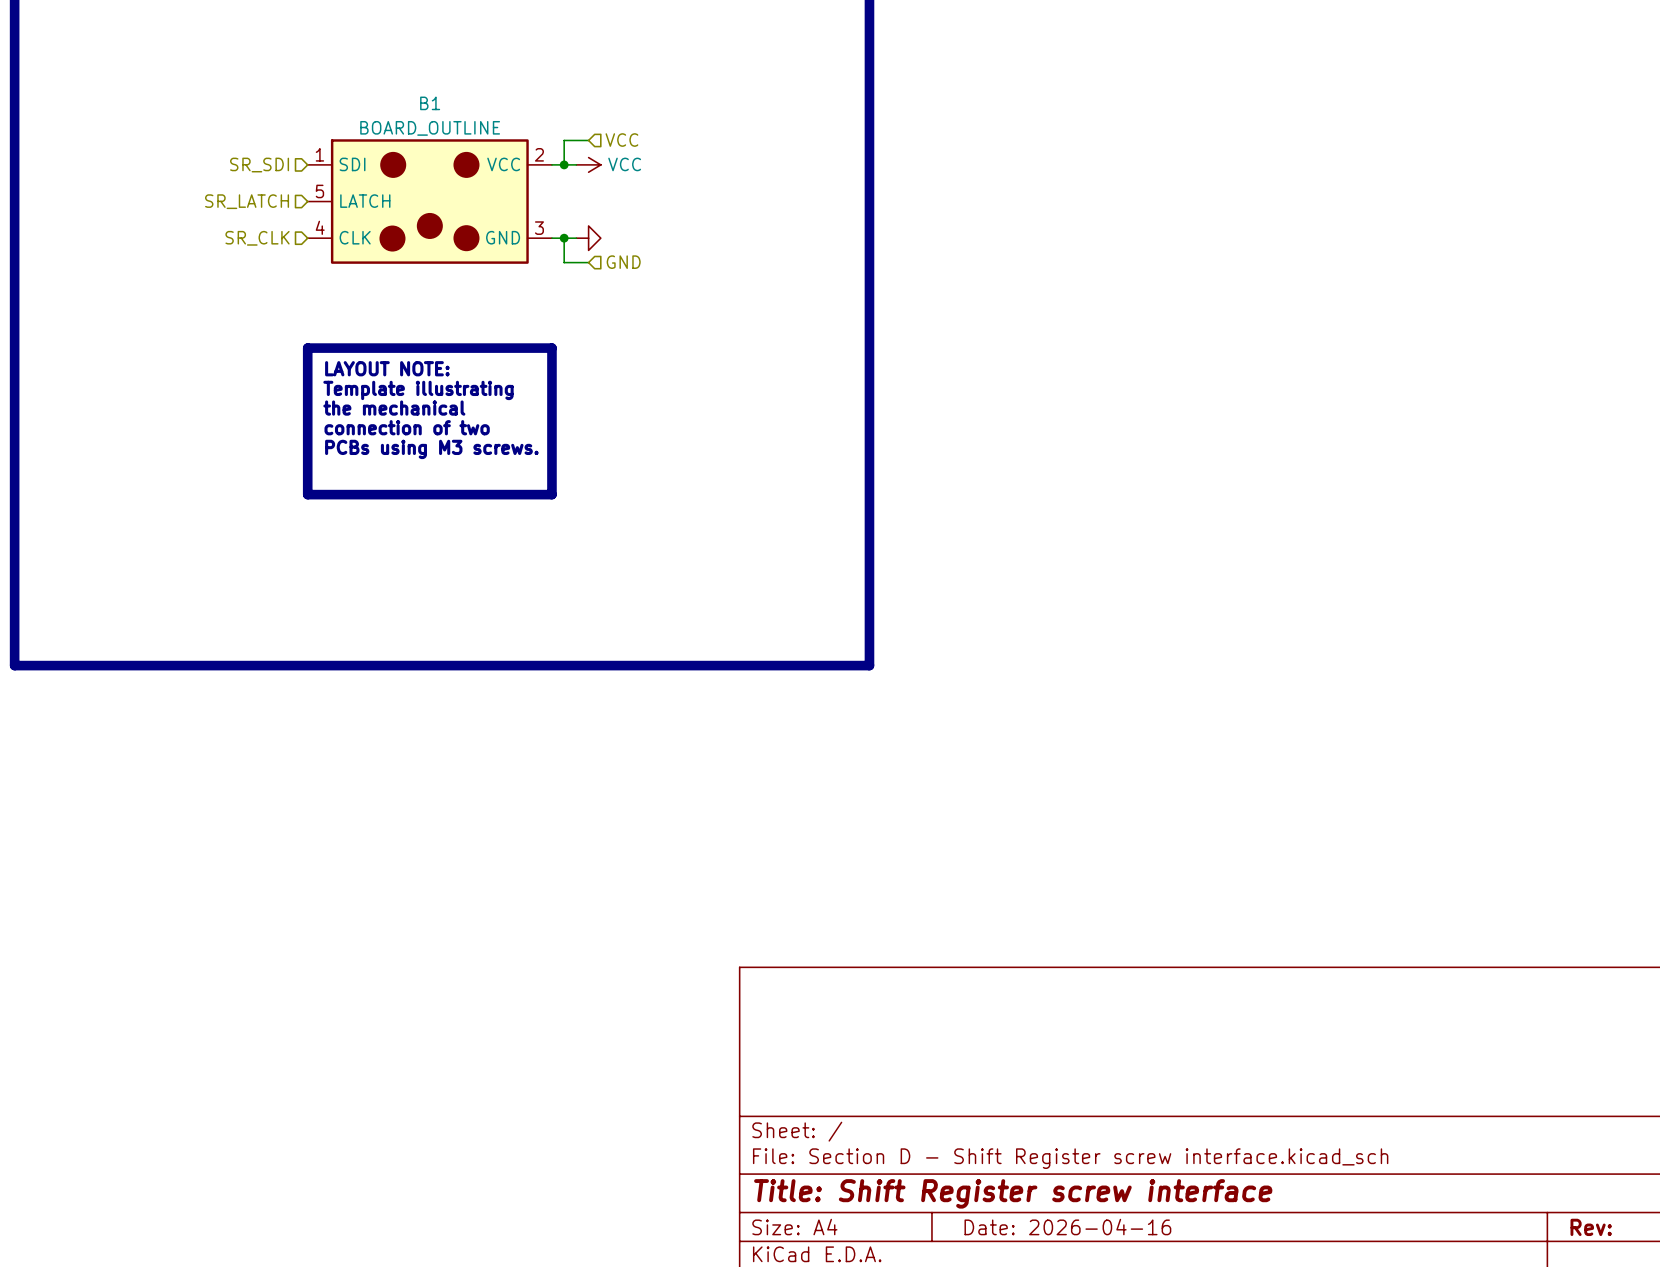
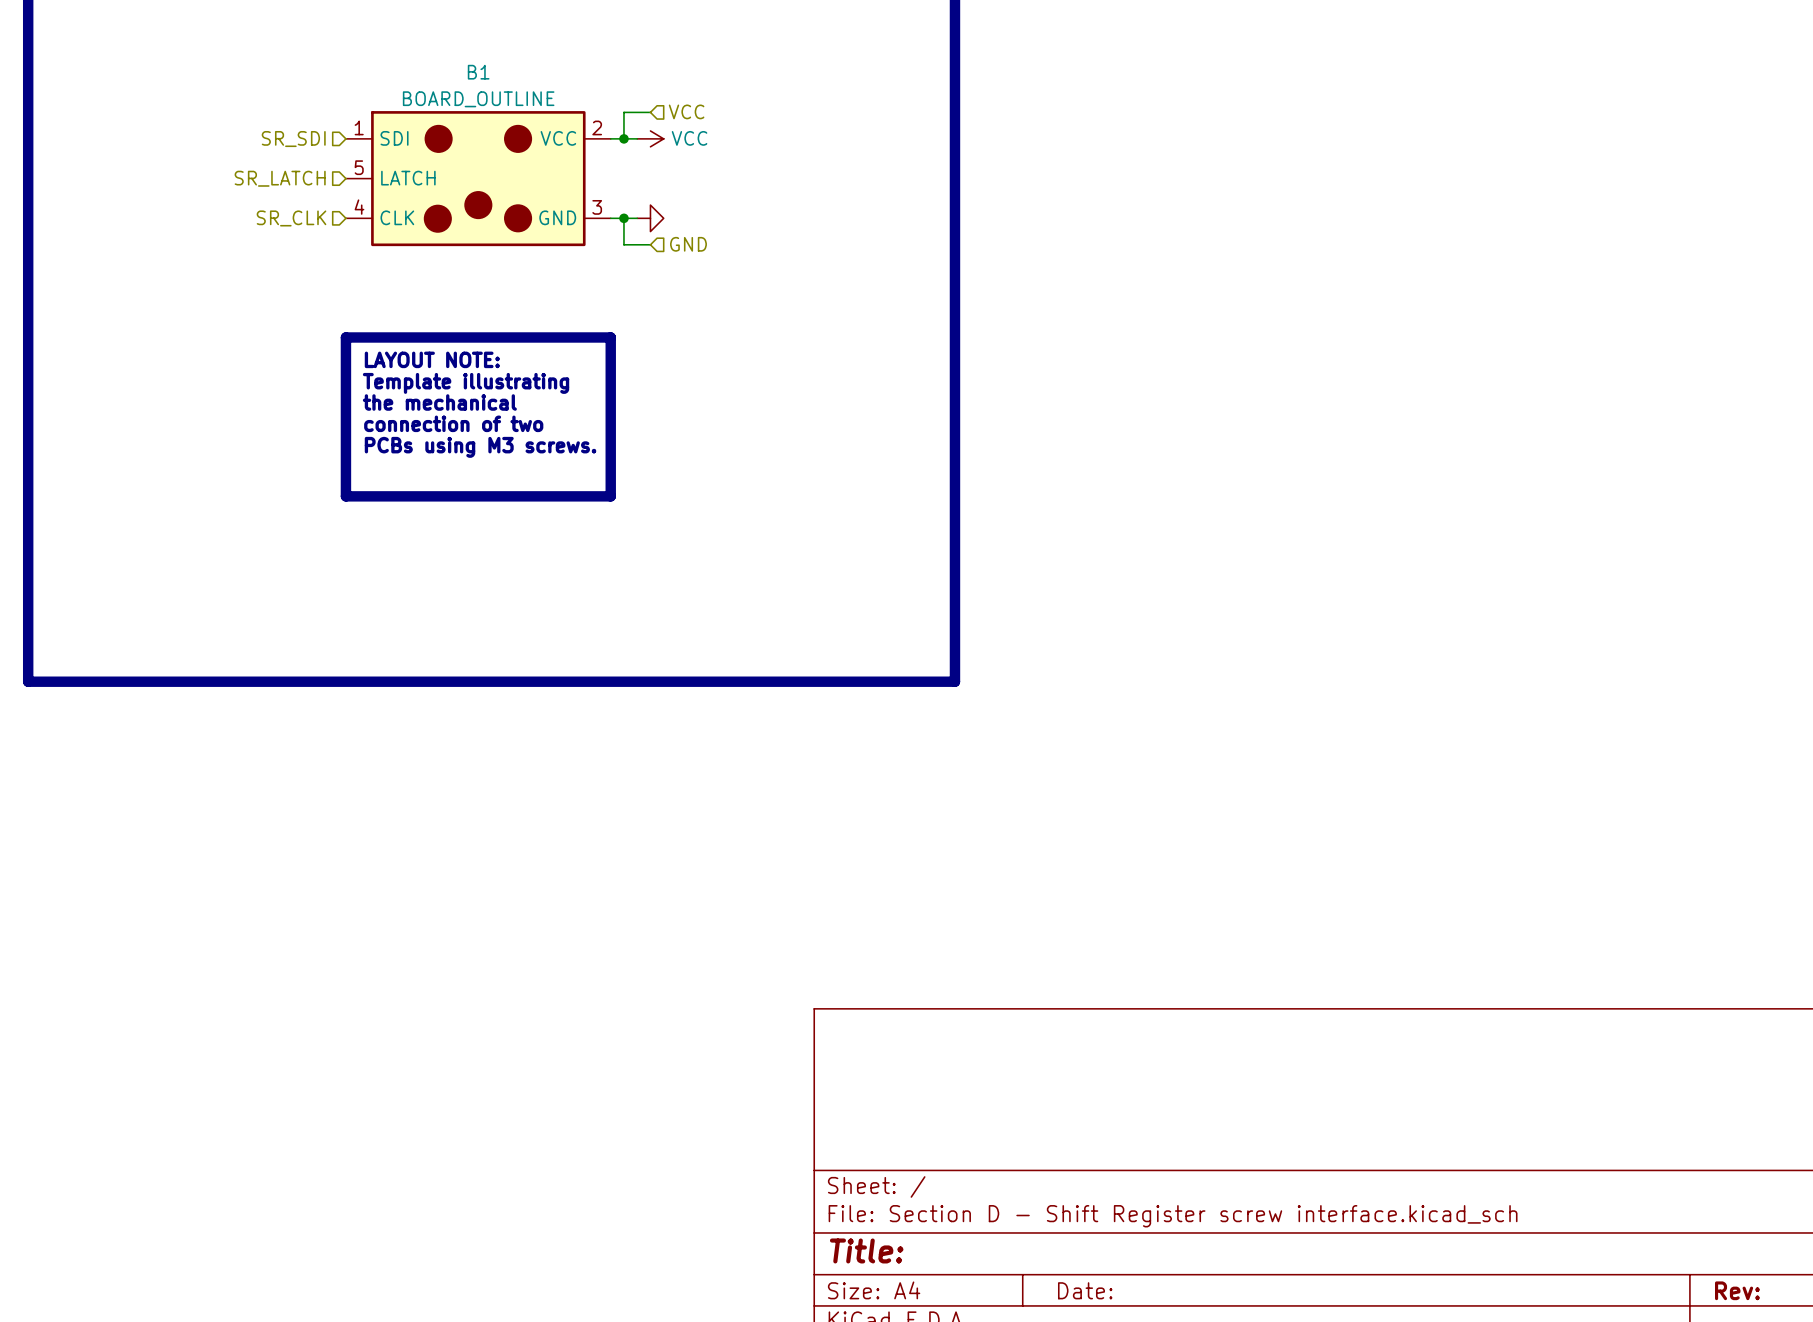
title block: Title: Shift Register screw interface (1013, 1193) -> Title: (866, 1250)
title block: Date: 2026-04-16 (1067, 1227) -> Date: (1085, 1290)

